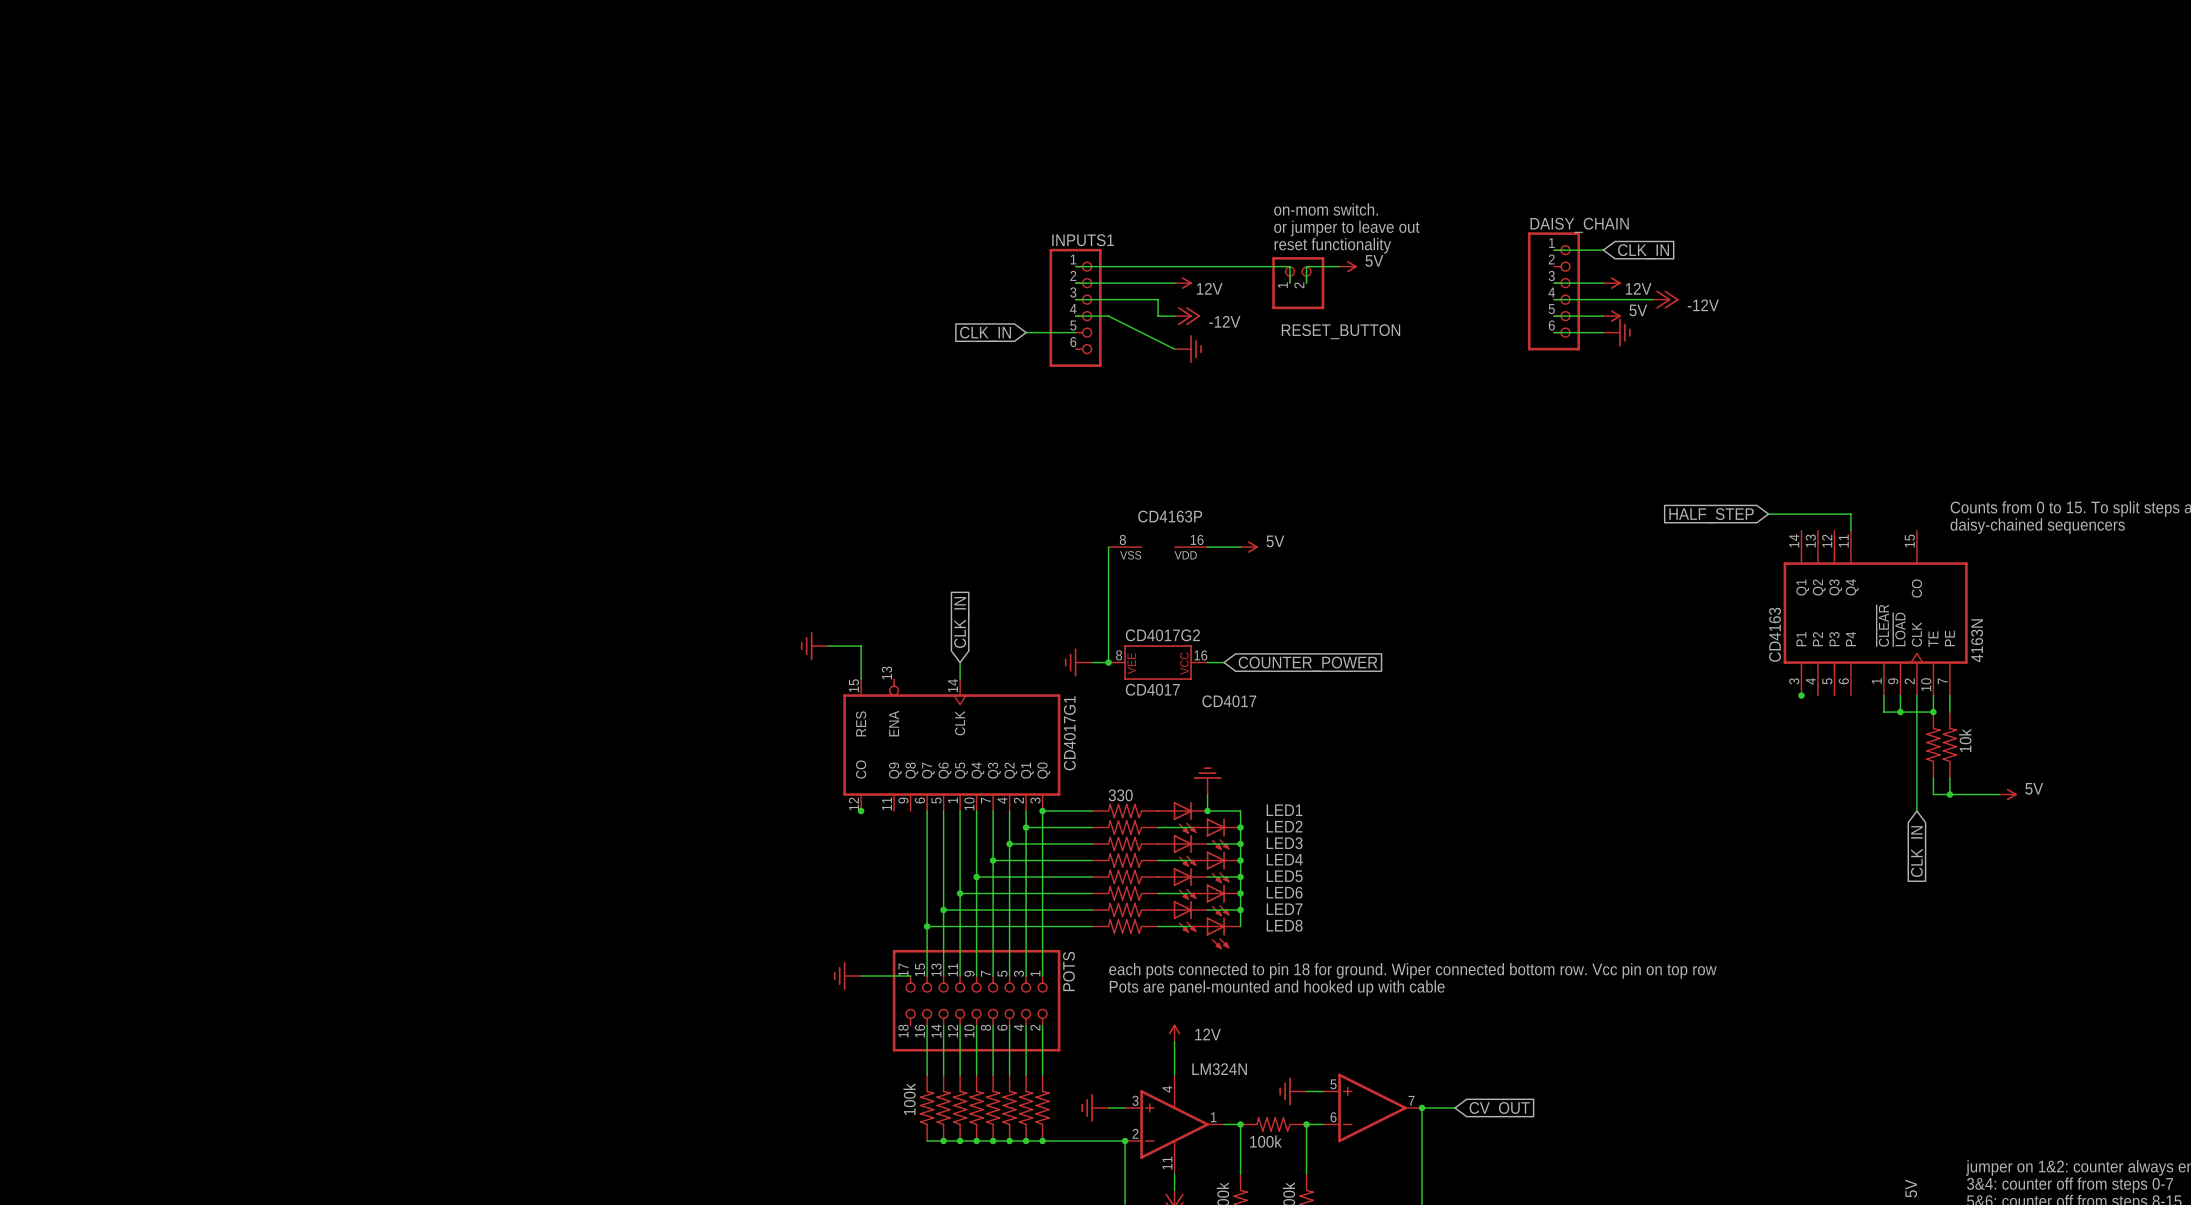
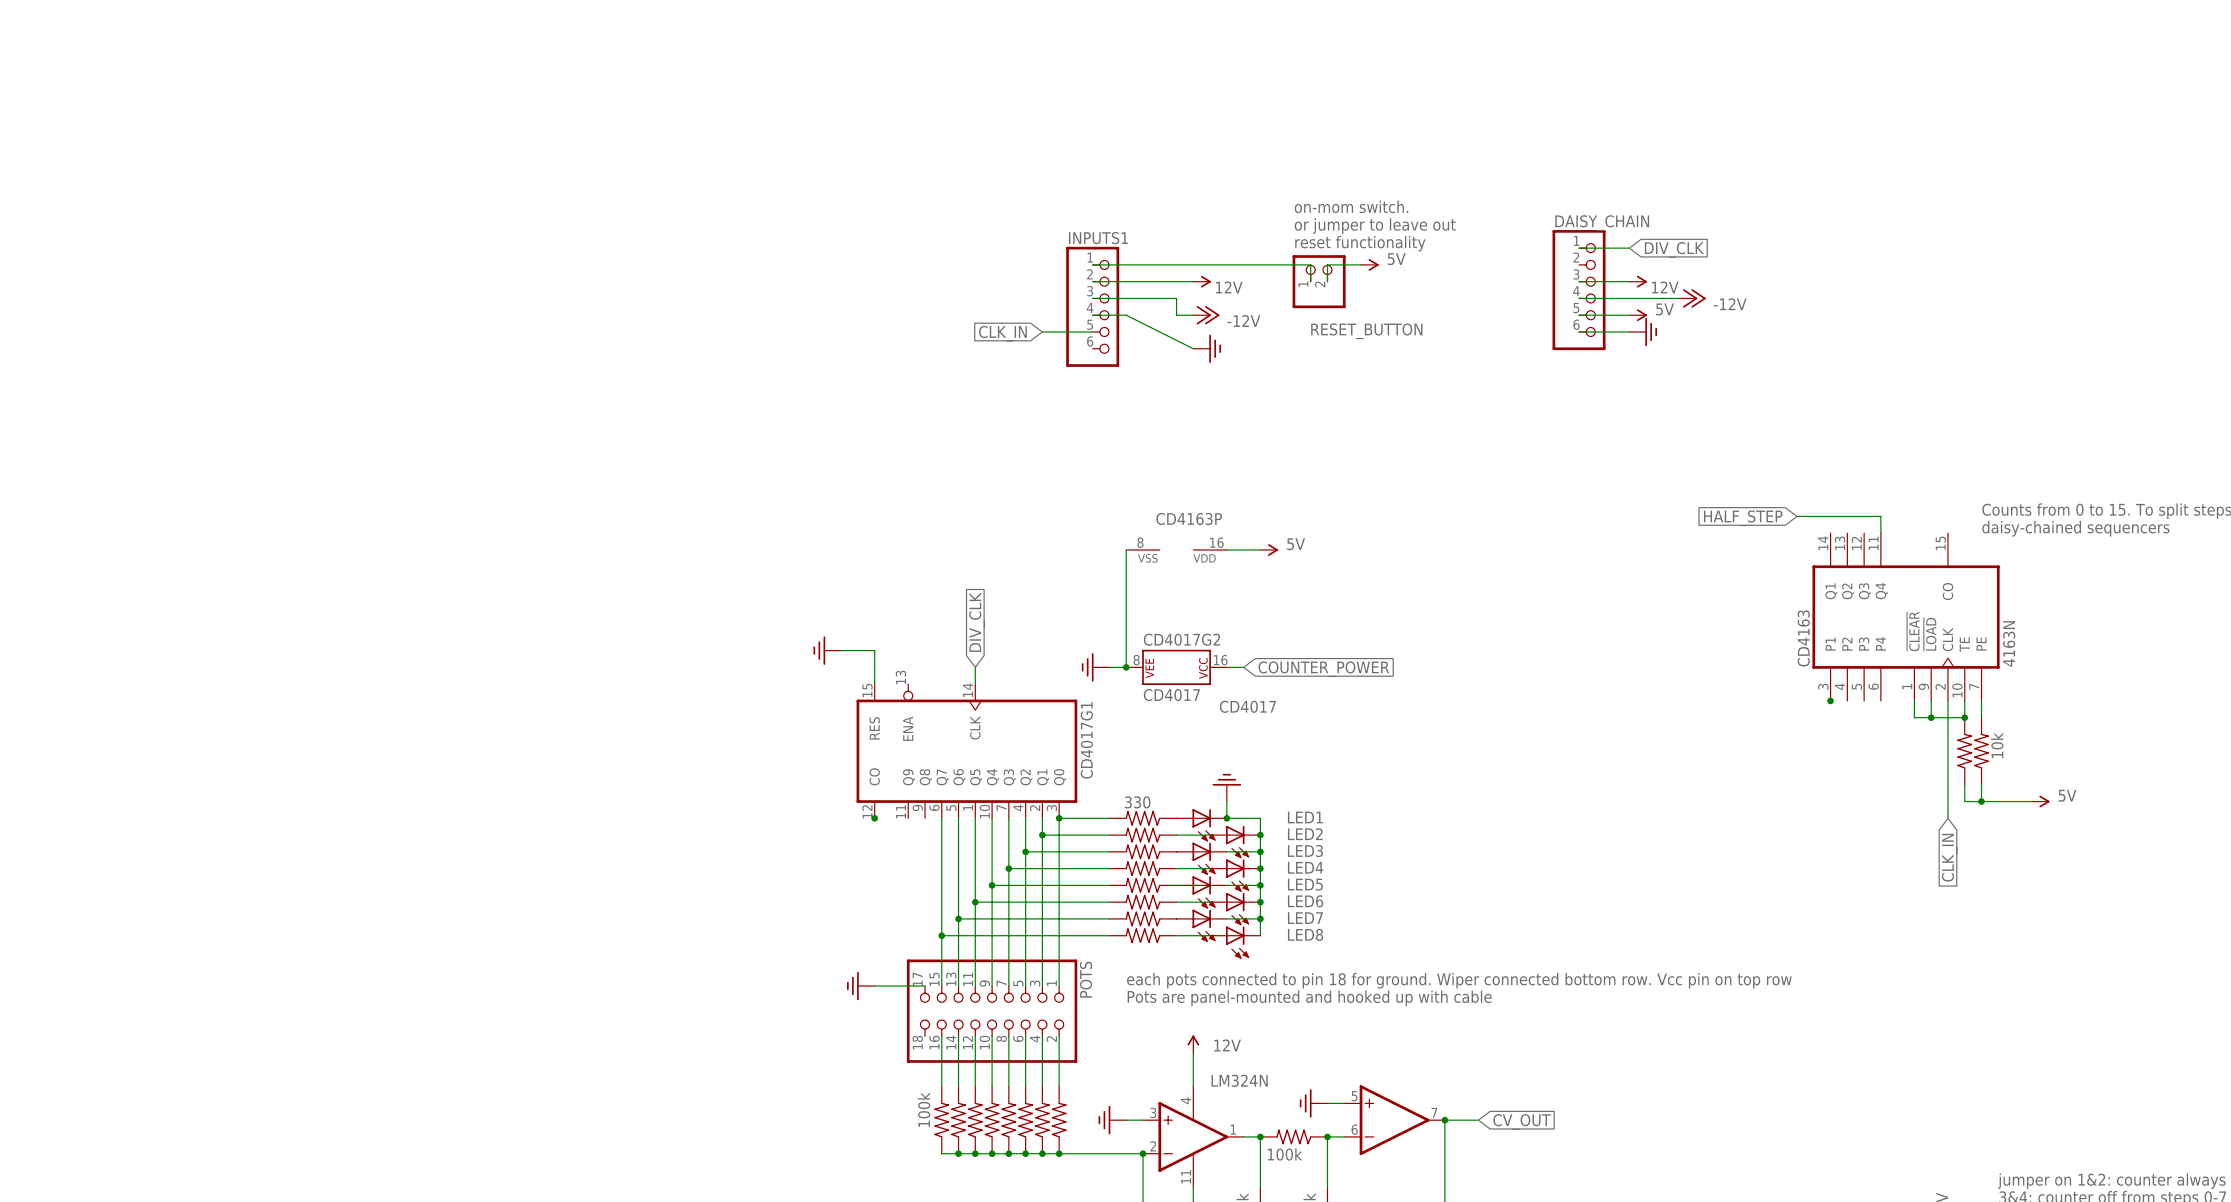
global label: CLK_IN (1643, 251) -> DIV_CLK (1674, 249)
global label: CLK_IN (961, 622) -> DIV_CLK (977, 622)

